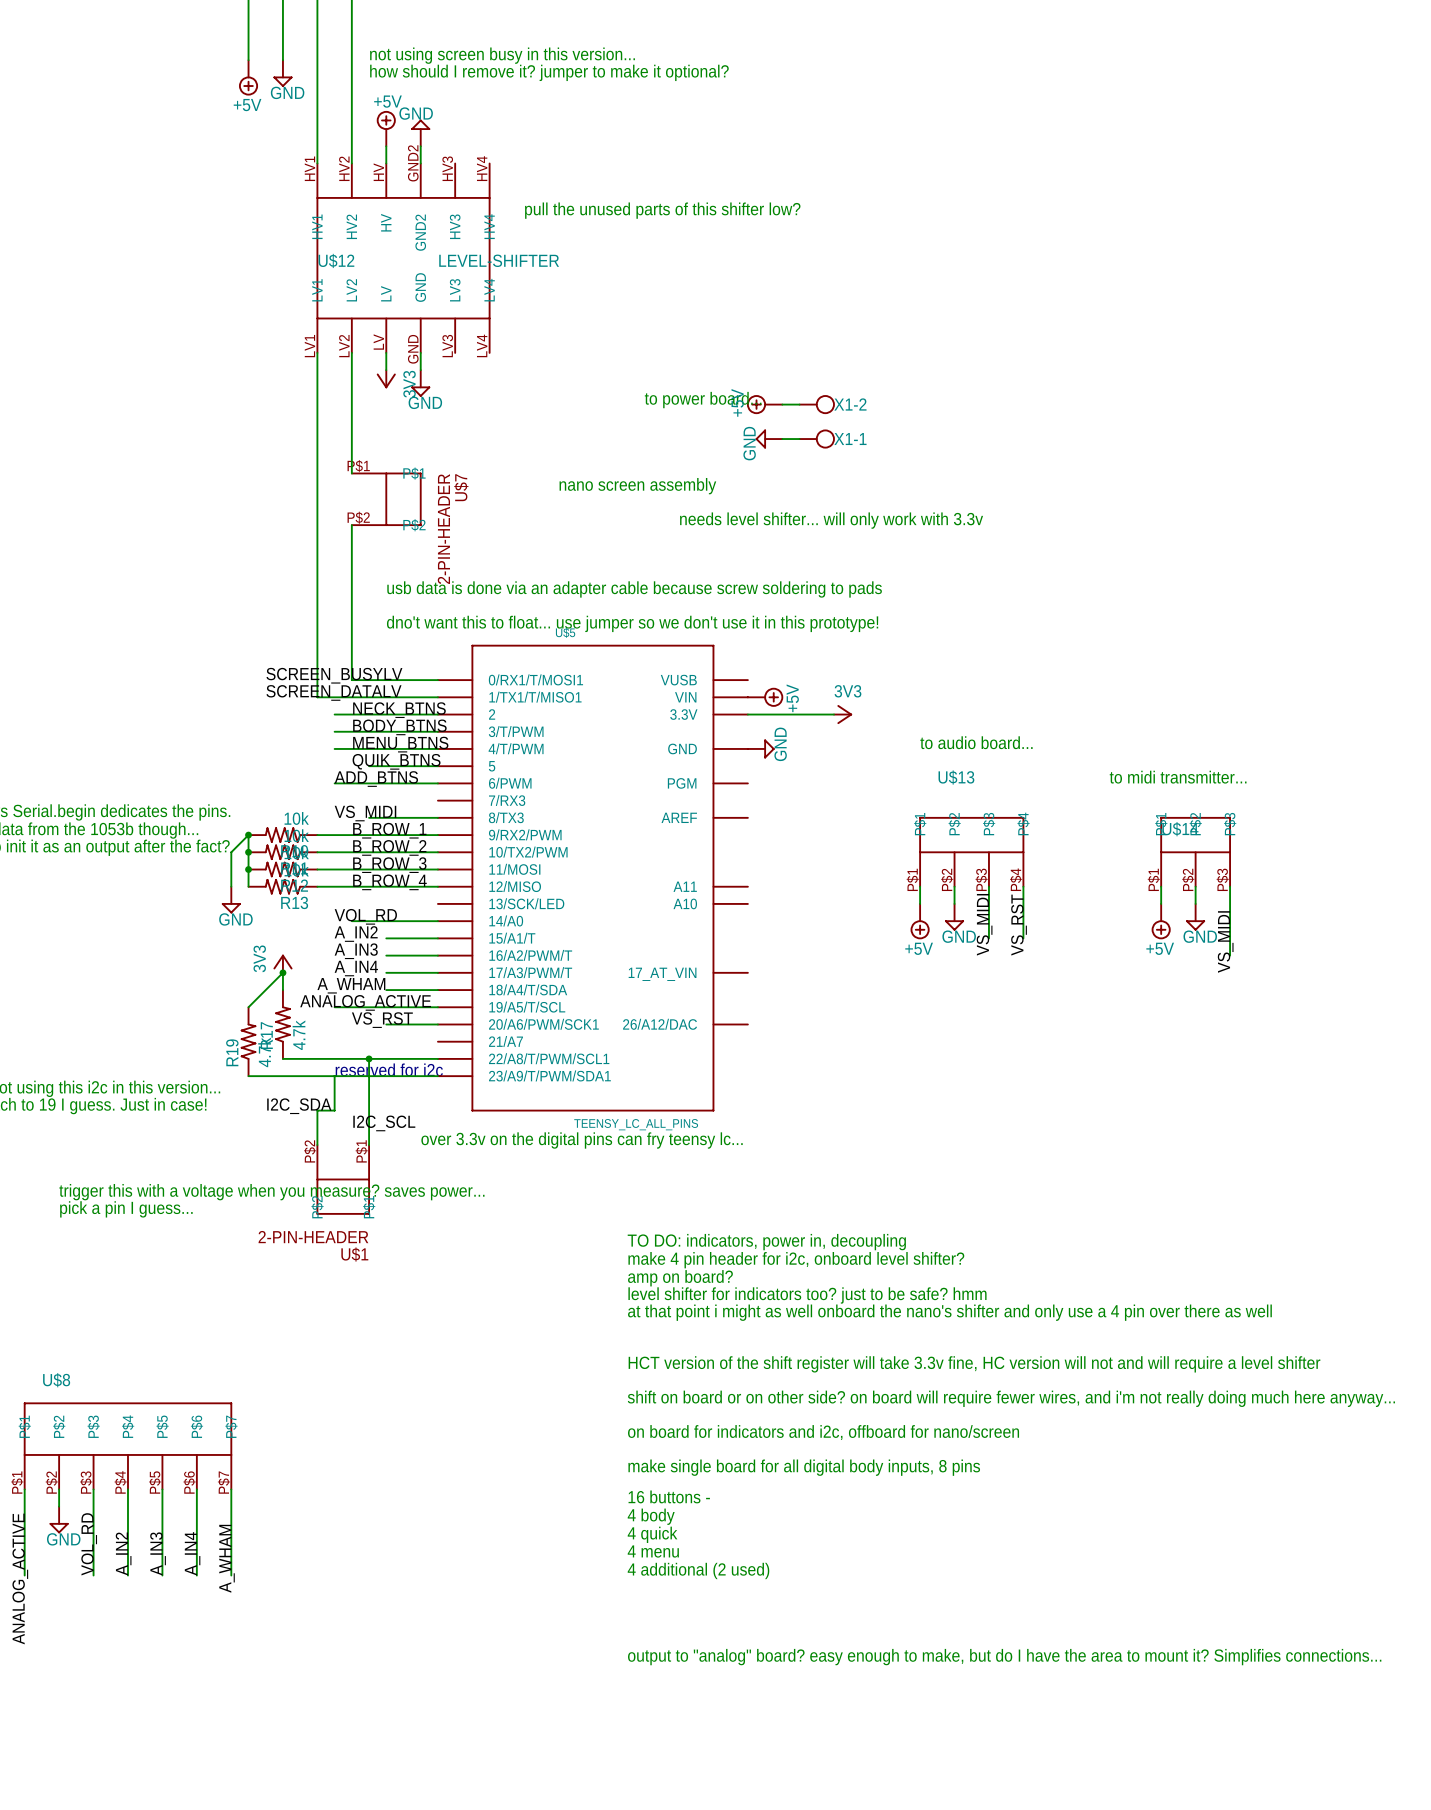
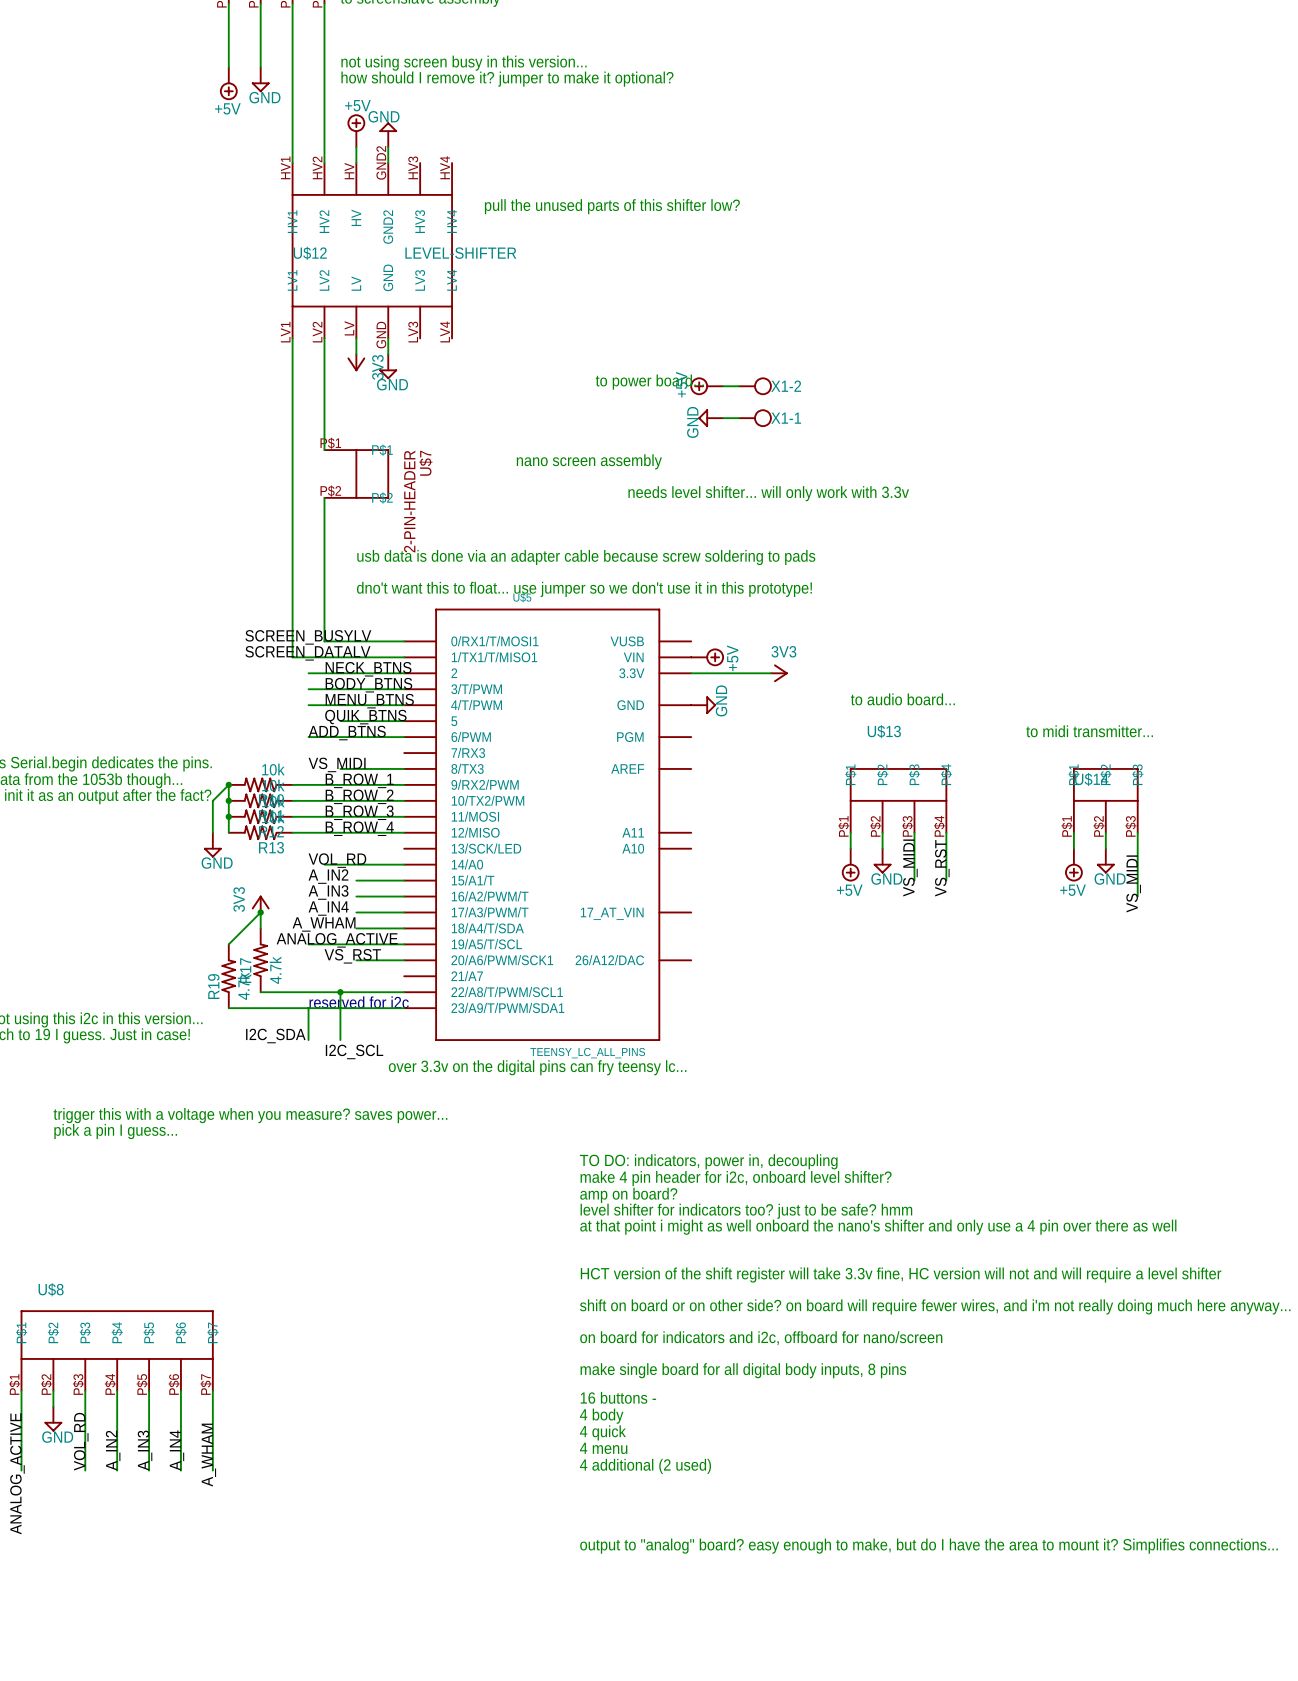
wire: (334, 1110) (317, 1110) (317, 1145) -> none
wire: (369, 1110) (369, 1145) -> none
U$1: 2-PIN-HEADER (343, 1179) -> none

